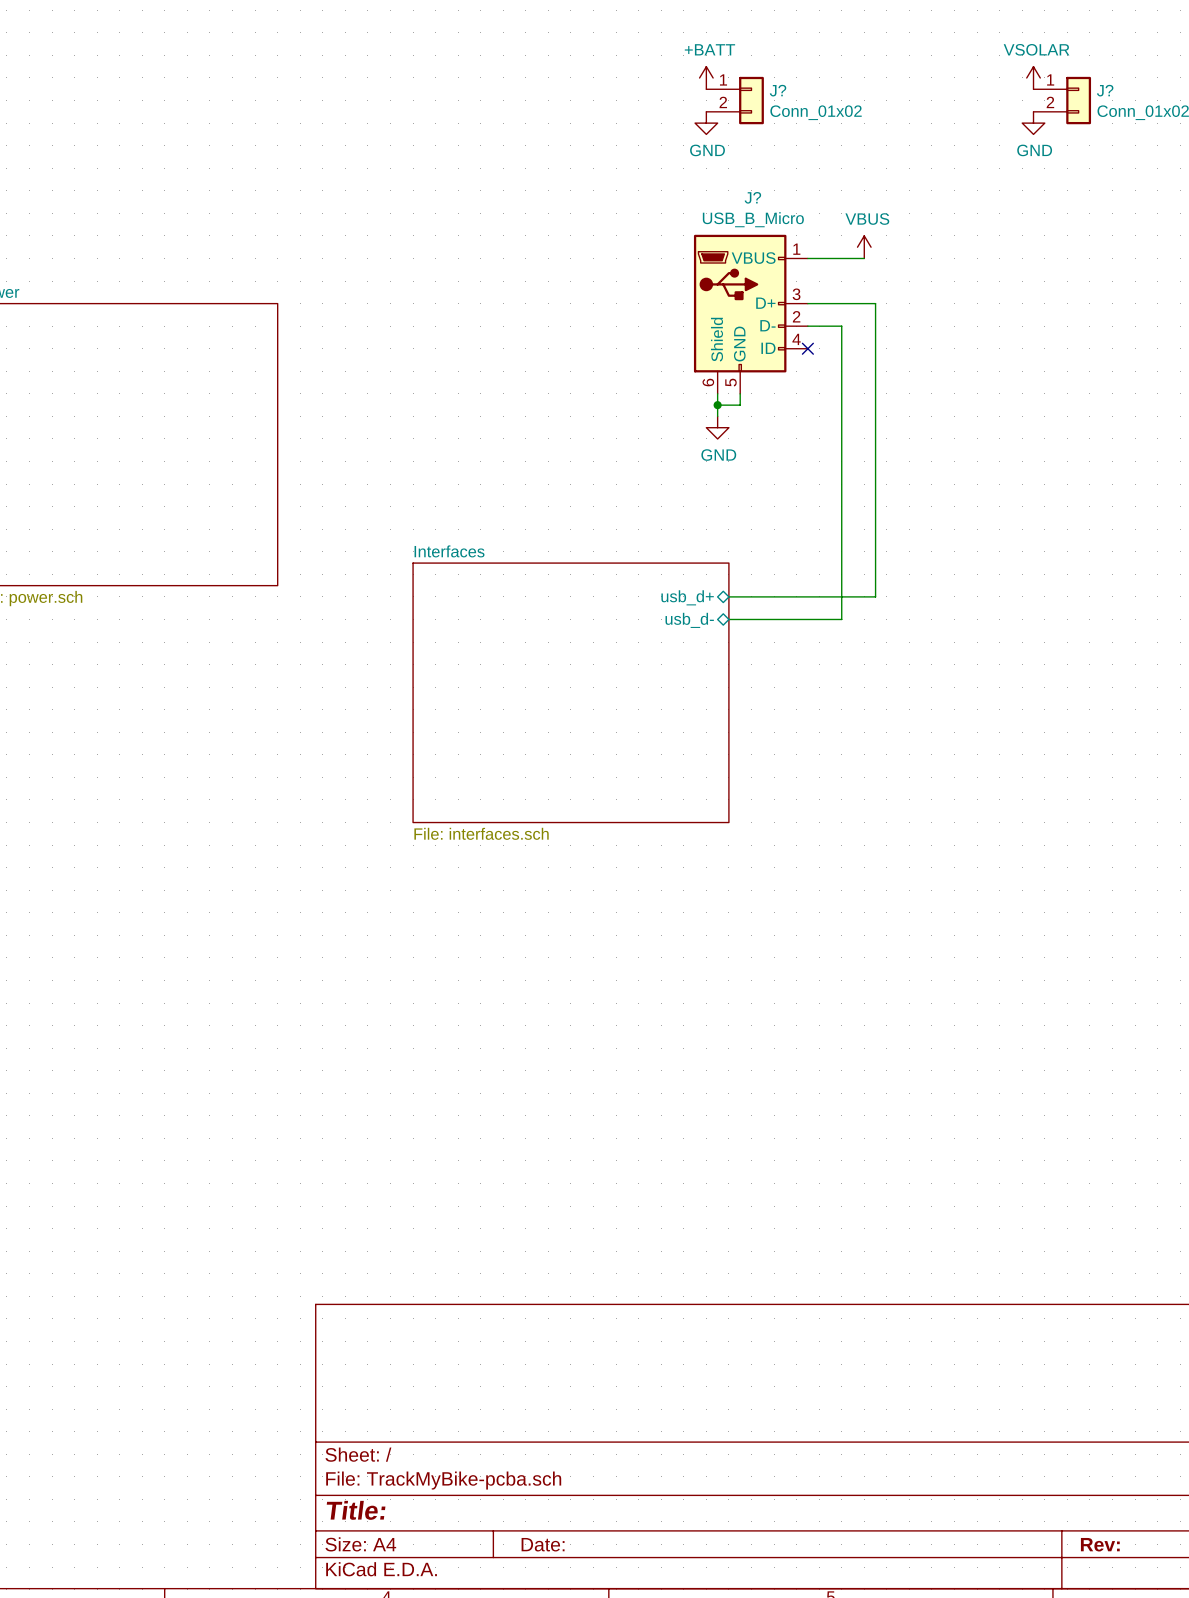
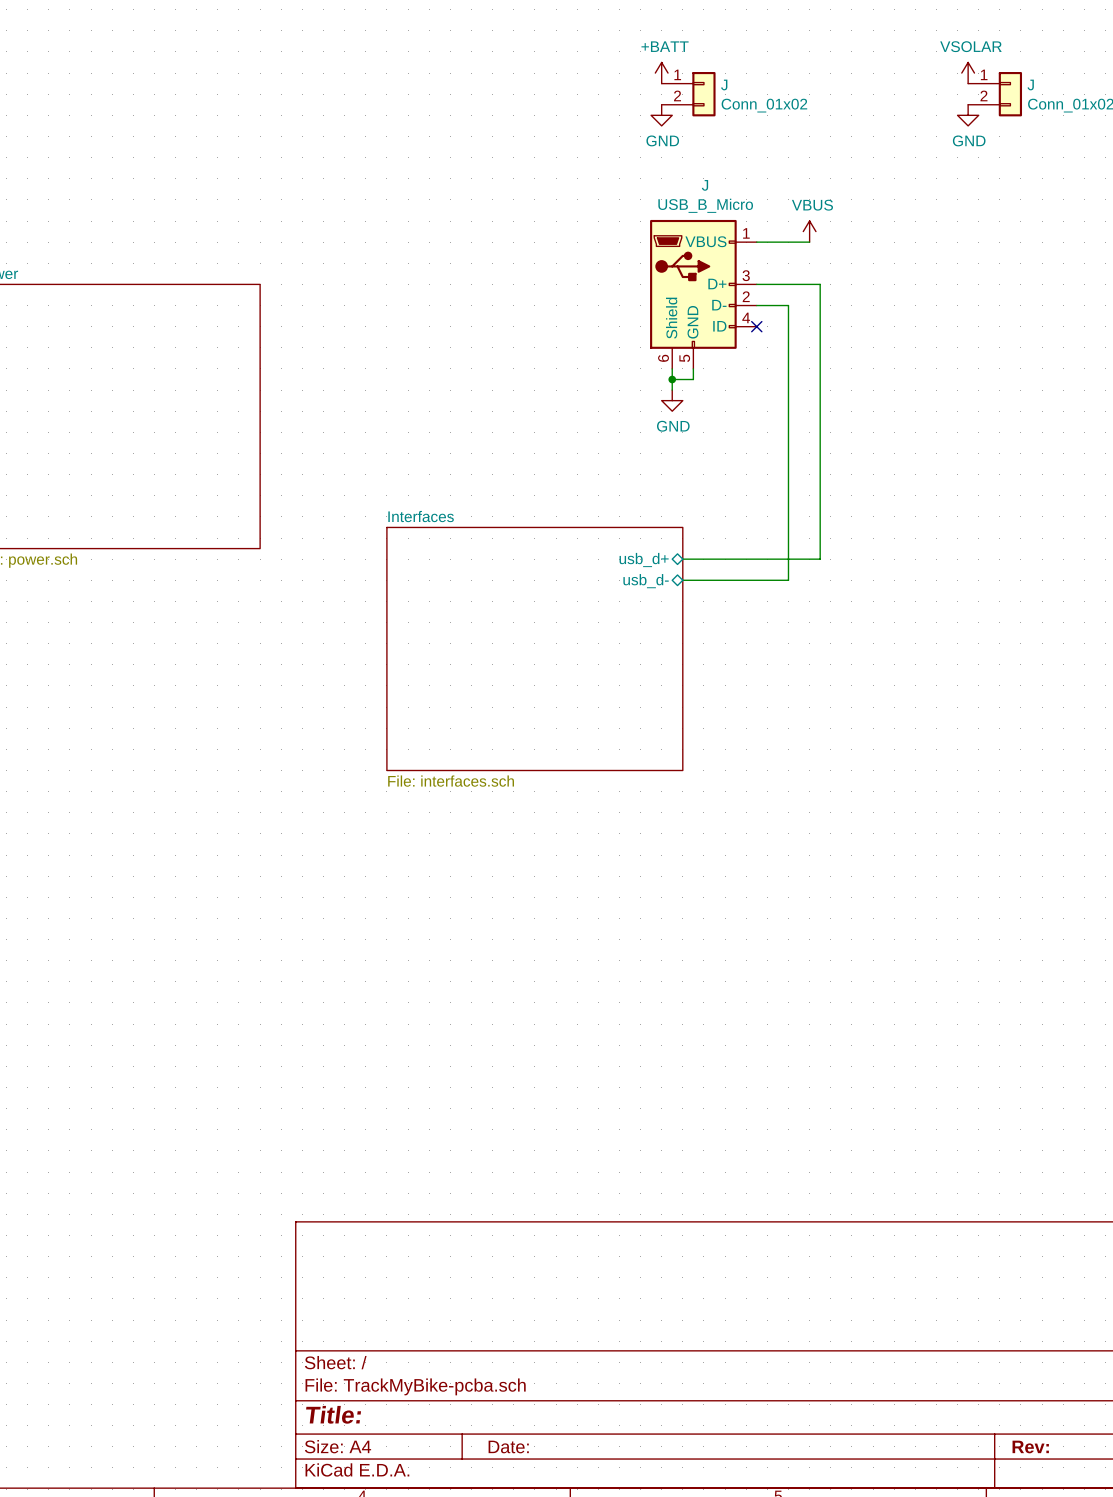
J? name: J? (778, 90) -> J (724, 84)
J? name: J? (1105, 90) -> J (1030, 84)
J? name: J? (752, 197) -> J (704, 185)

